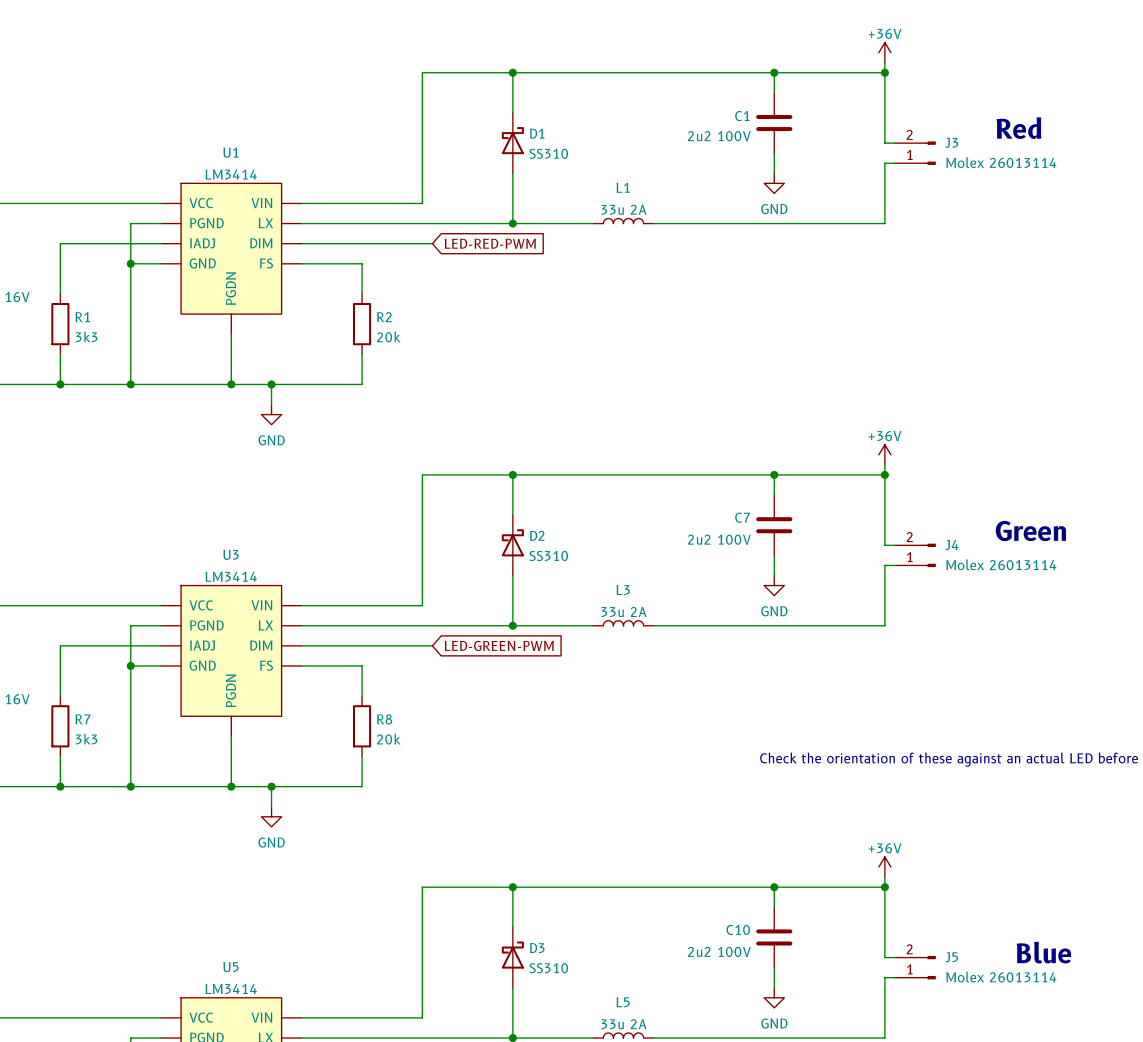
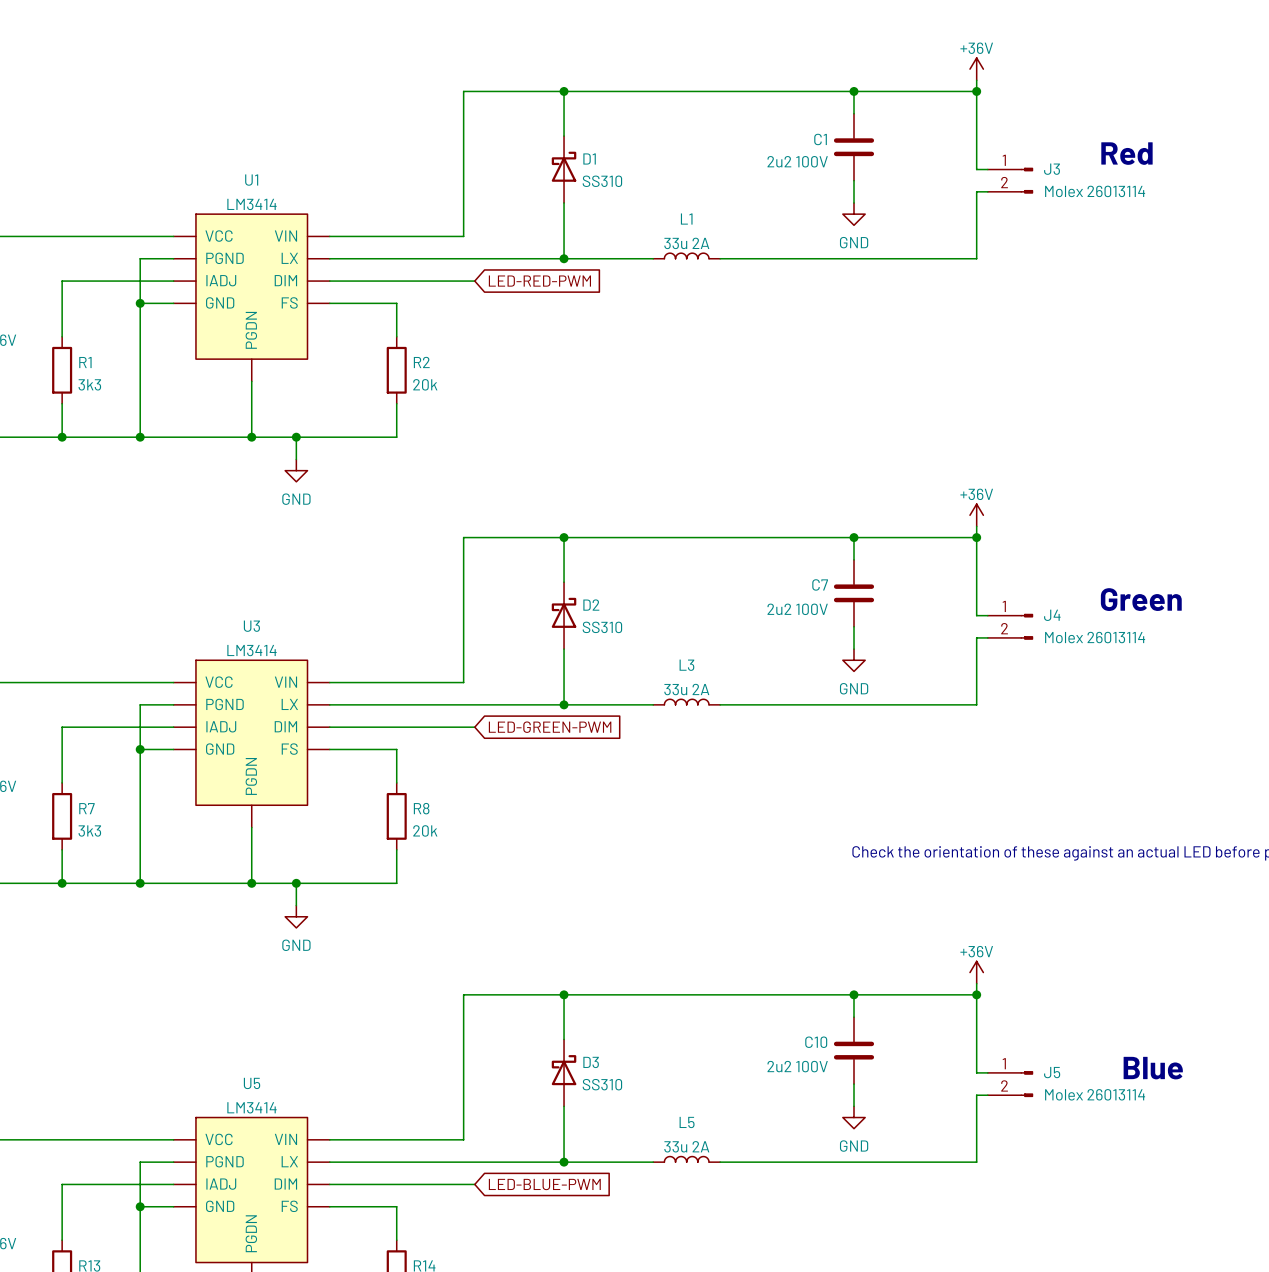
J3 flip: as is (930, 153) -> up-down (1026, 180)
J4 flip: as is (930, 555) -> up-down (1026, 626)
J5 flip: as is (930, 967) -> up-down (1026, 1084)

